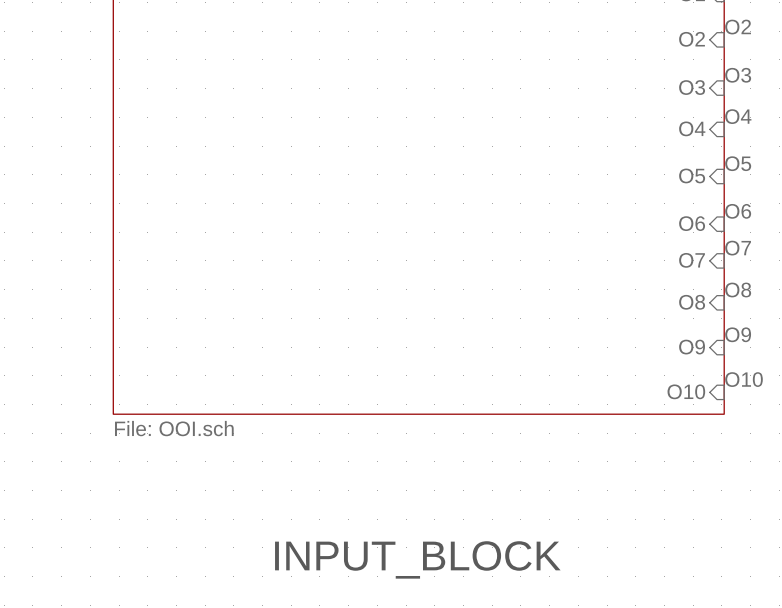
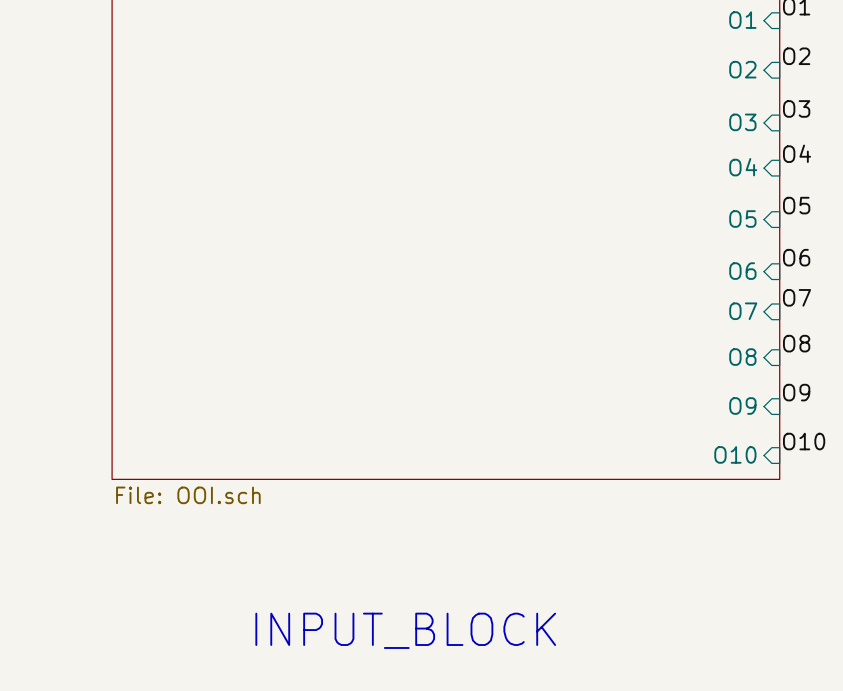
text position: INPUT_BLOCK (417, 559) -> INPUT_BLOCK (405, 630)

